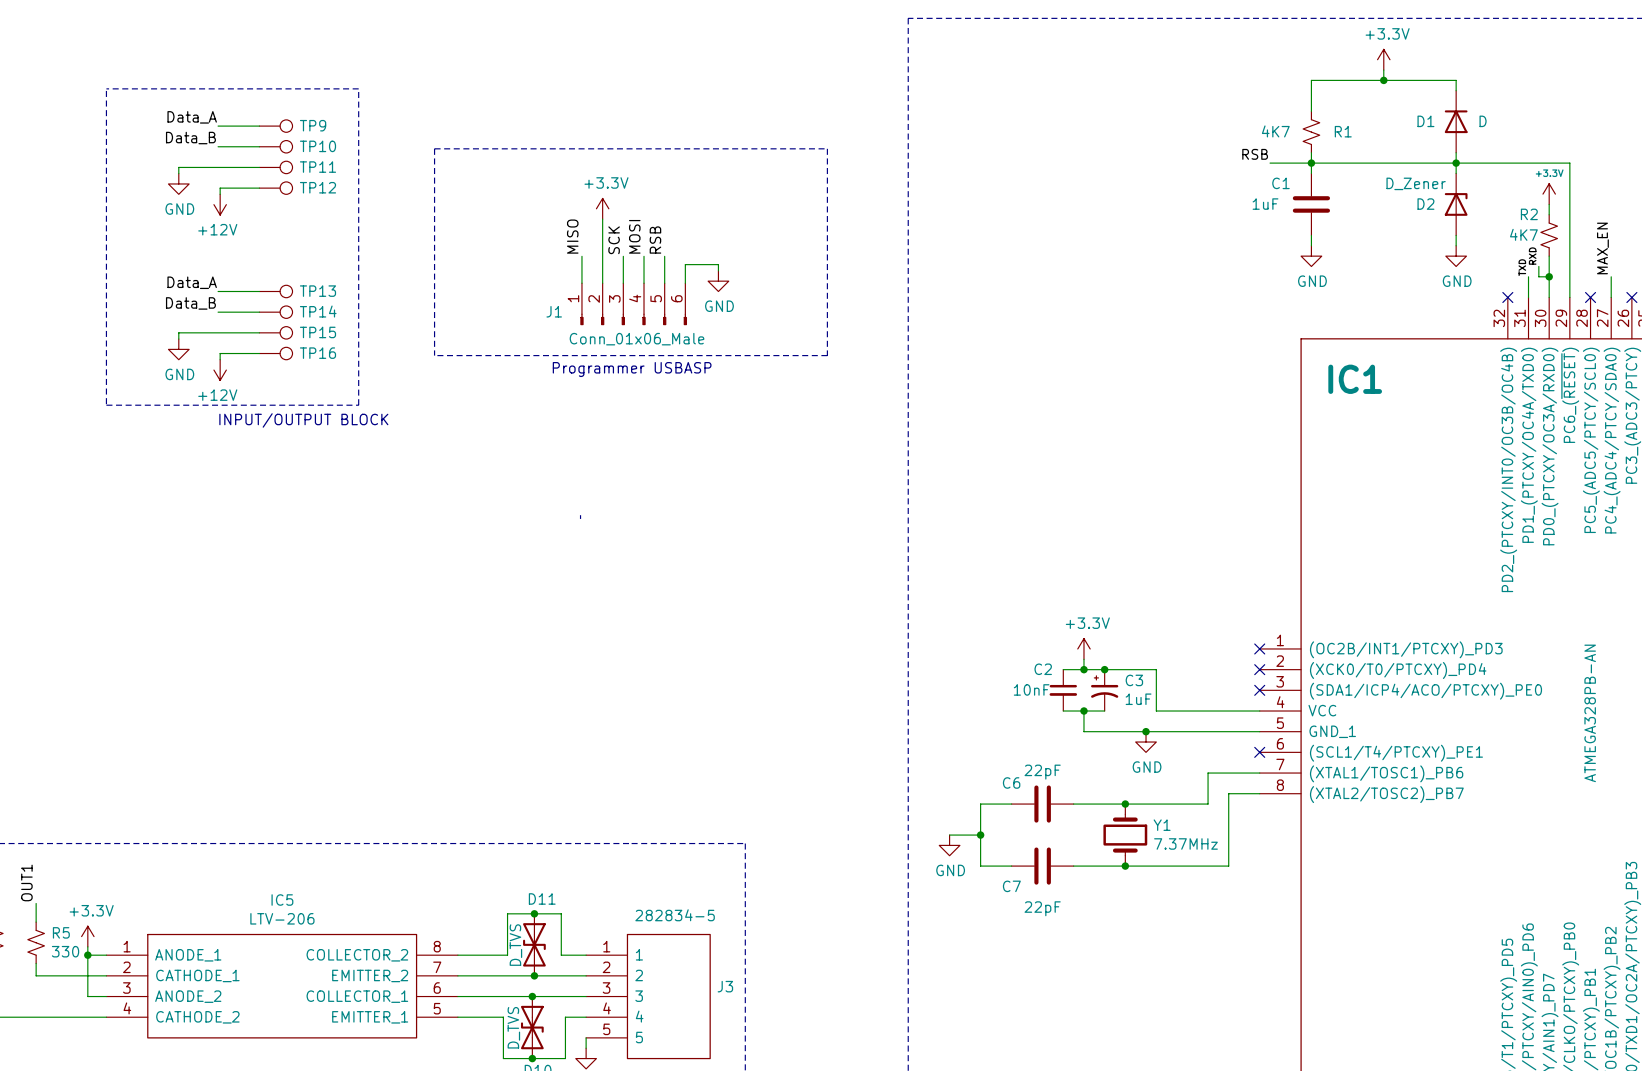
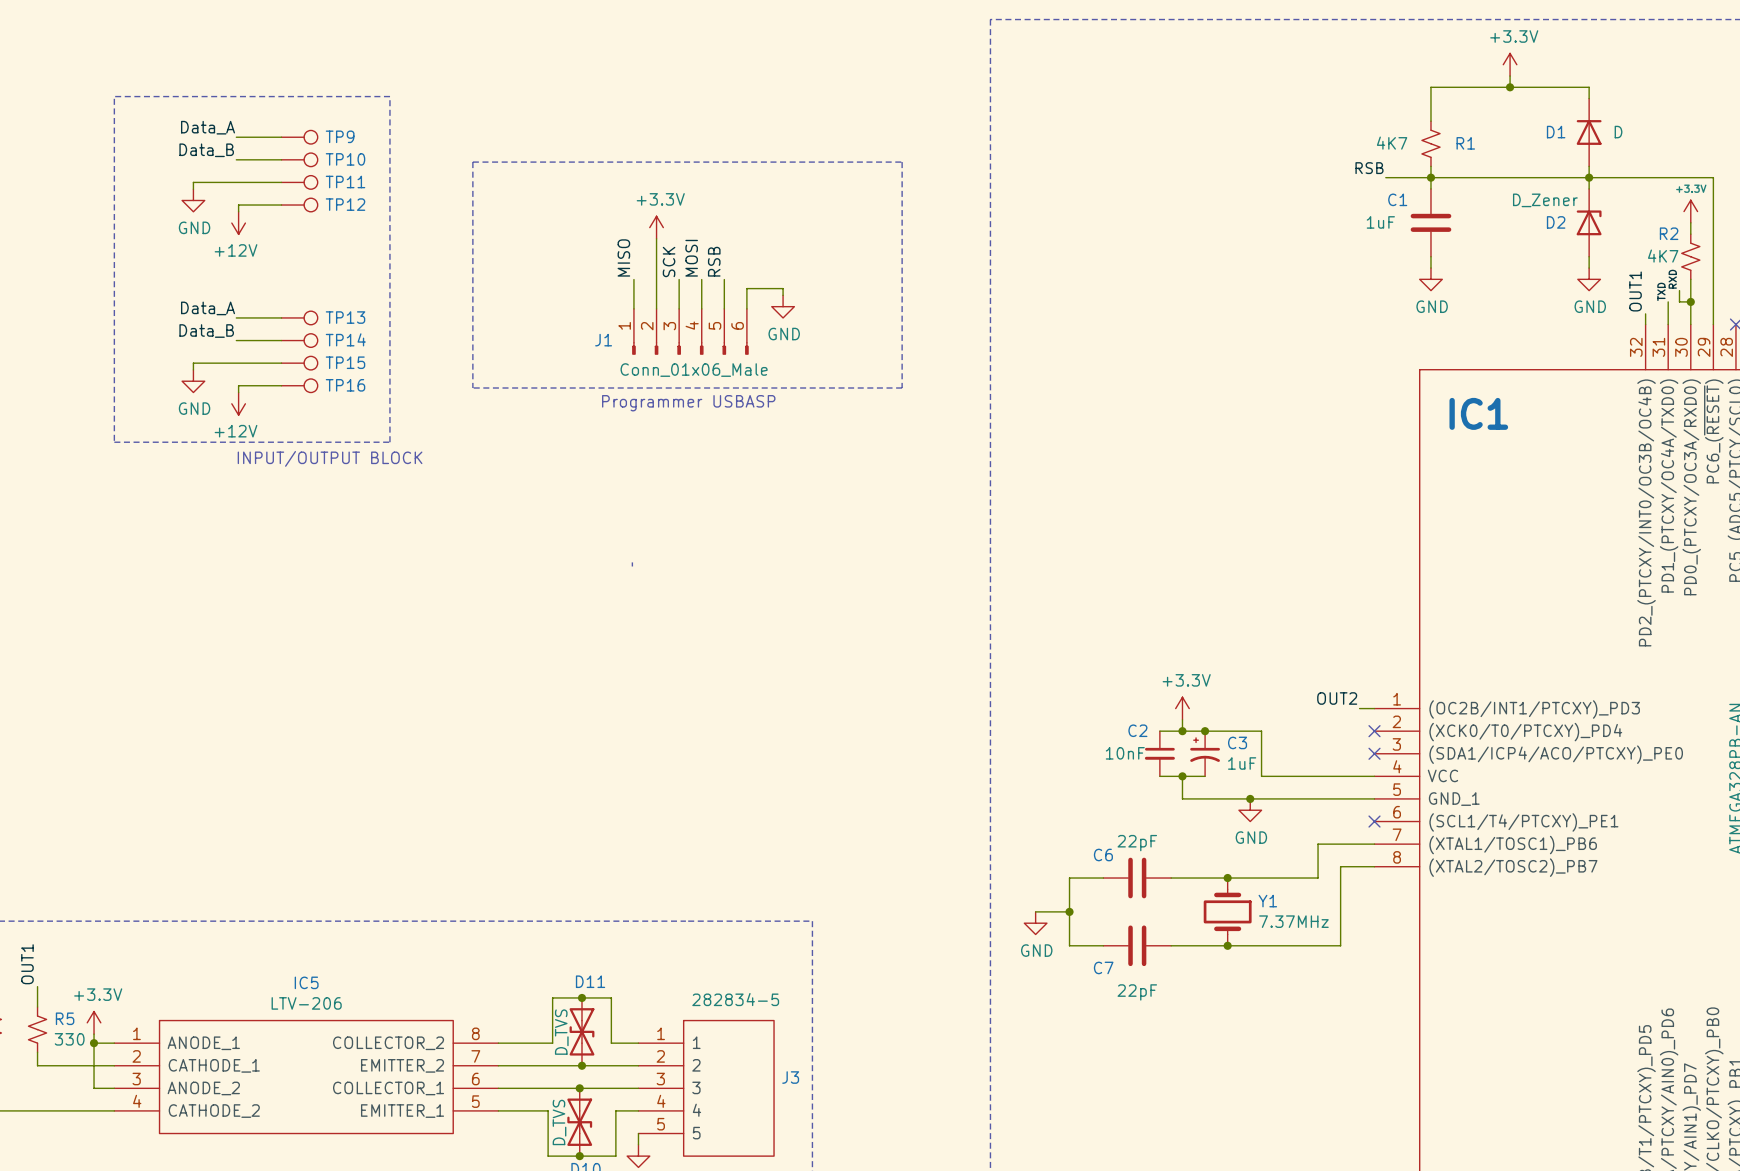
label: none -> OUT1 (1635, 291)
wire: none -> (1645, 313) (1645, 324)
no-connect mark: (1507, 297) -> none
label: none -> OUT2 (1337, 698)
wire: none -> (1359, 708) (1374, 708)
no-connect mark: (1259, 648) -> none

